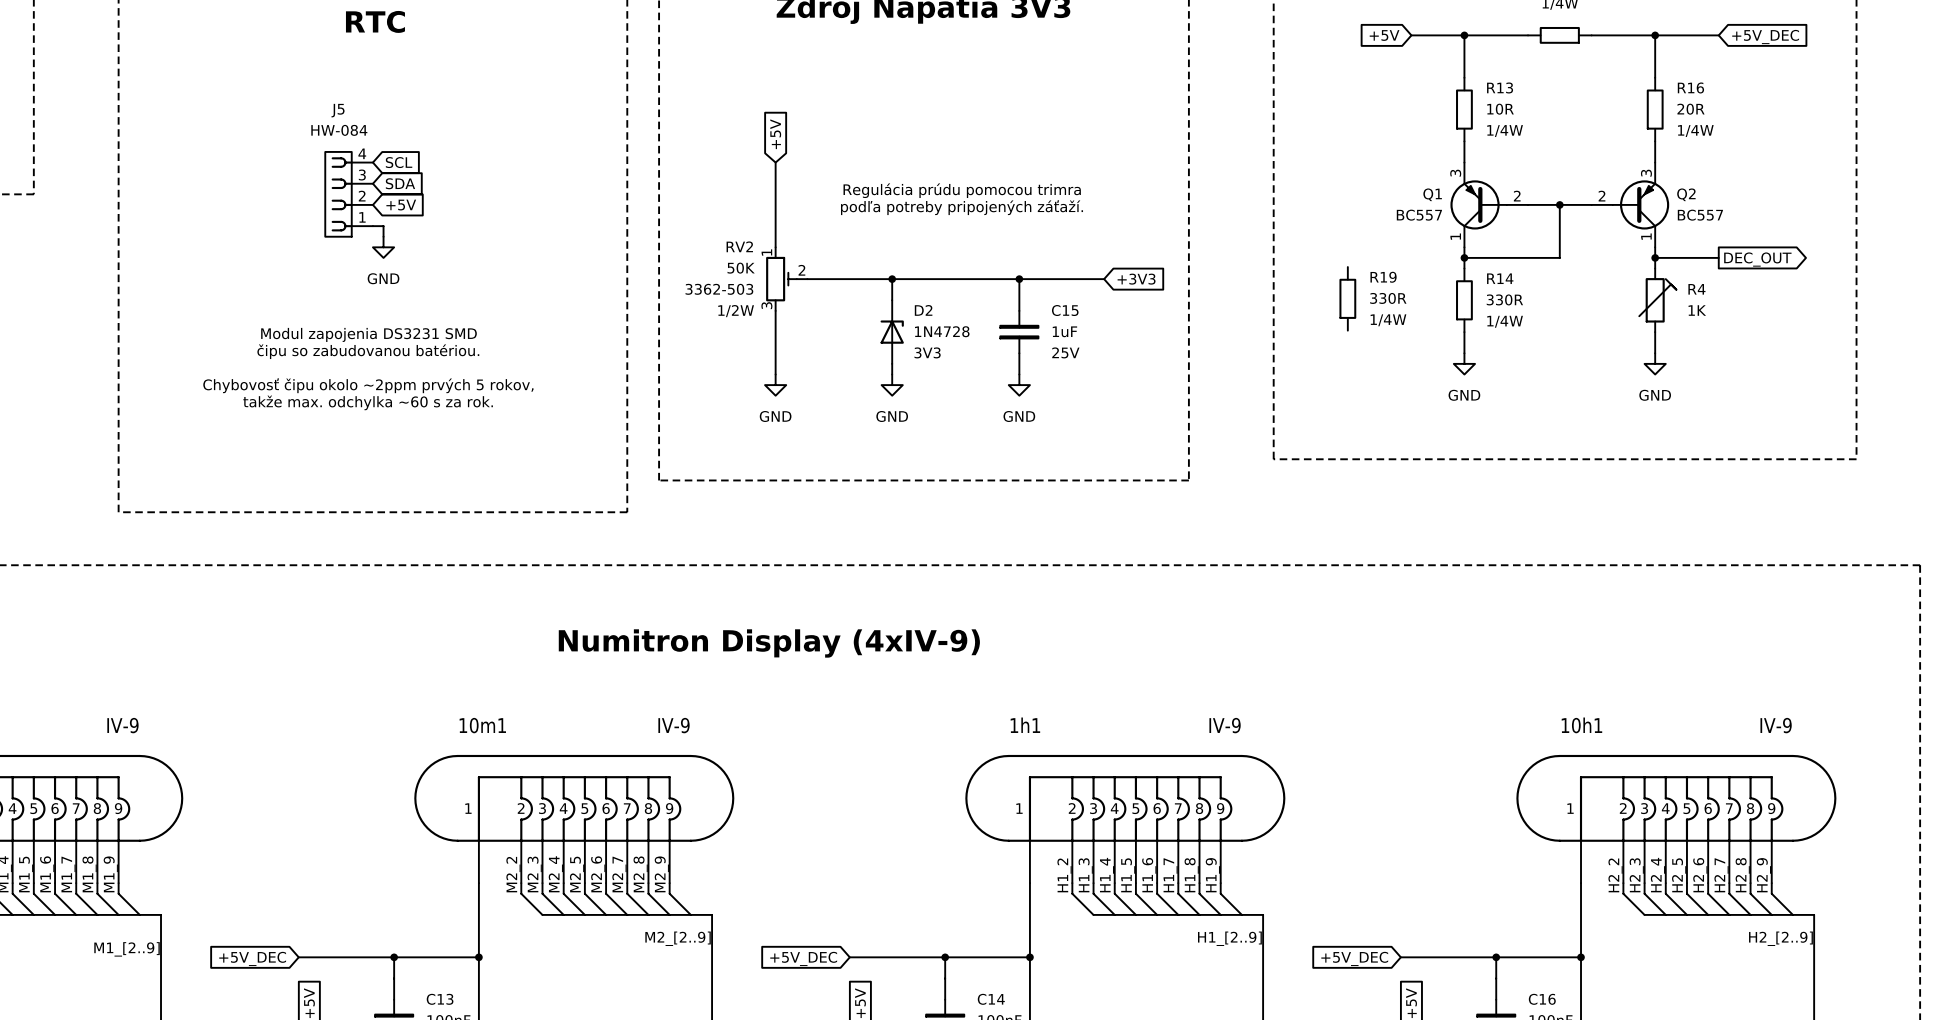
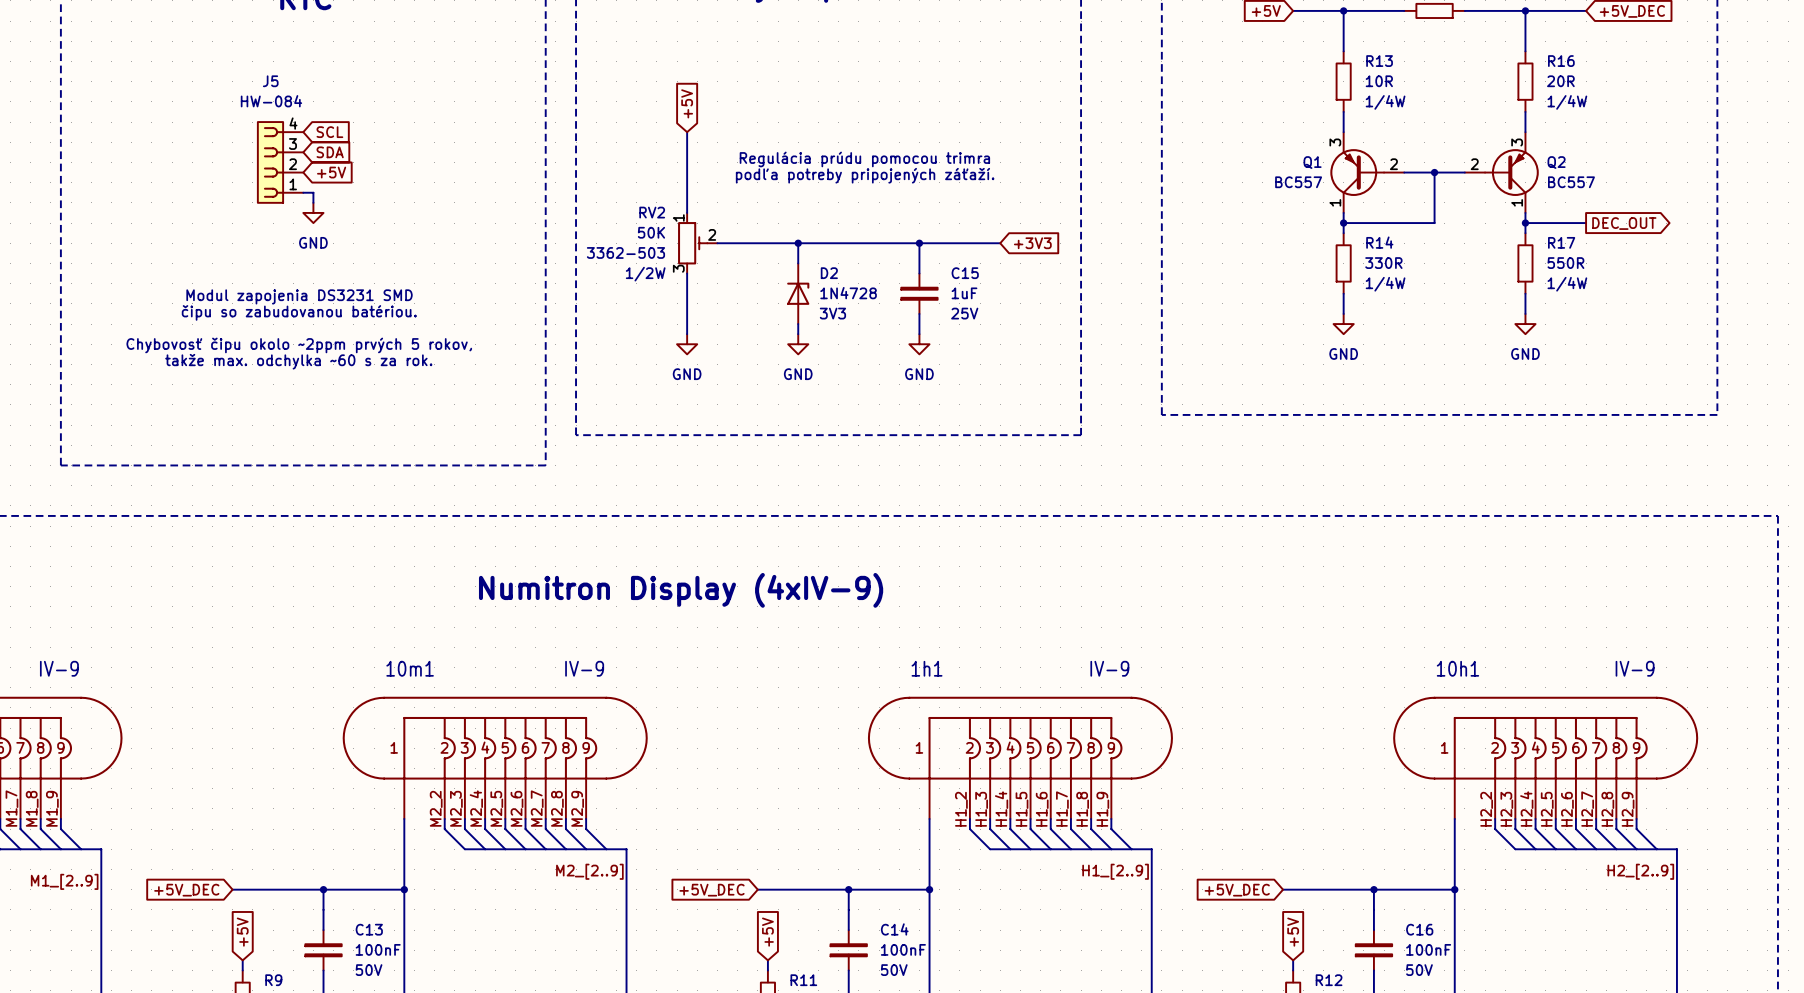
R19: 330R (1347, 298) -> none
R17: none -> 550R (1525, 263)
R4: 1K (1657, 300) -> none

